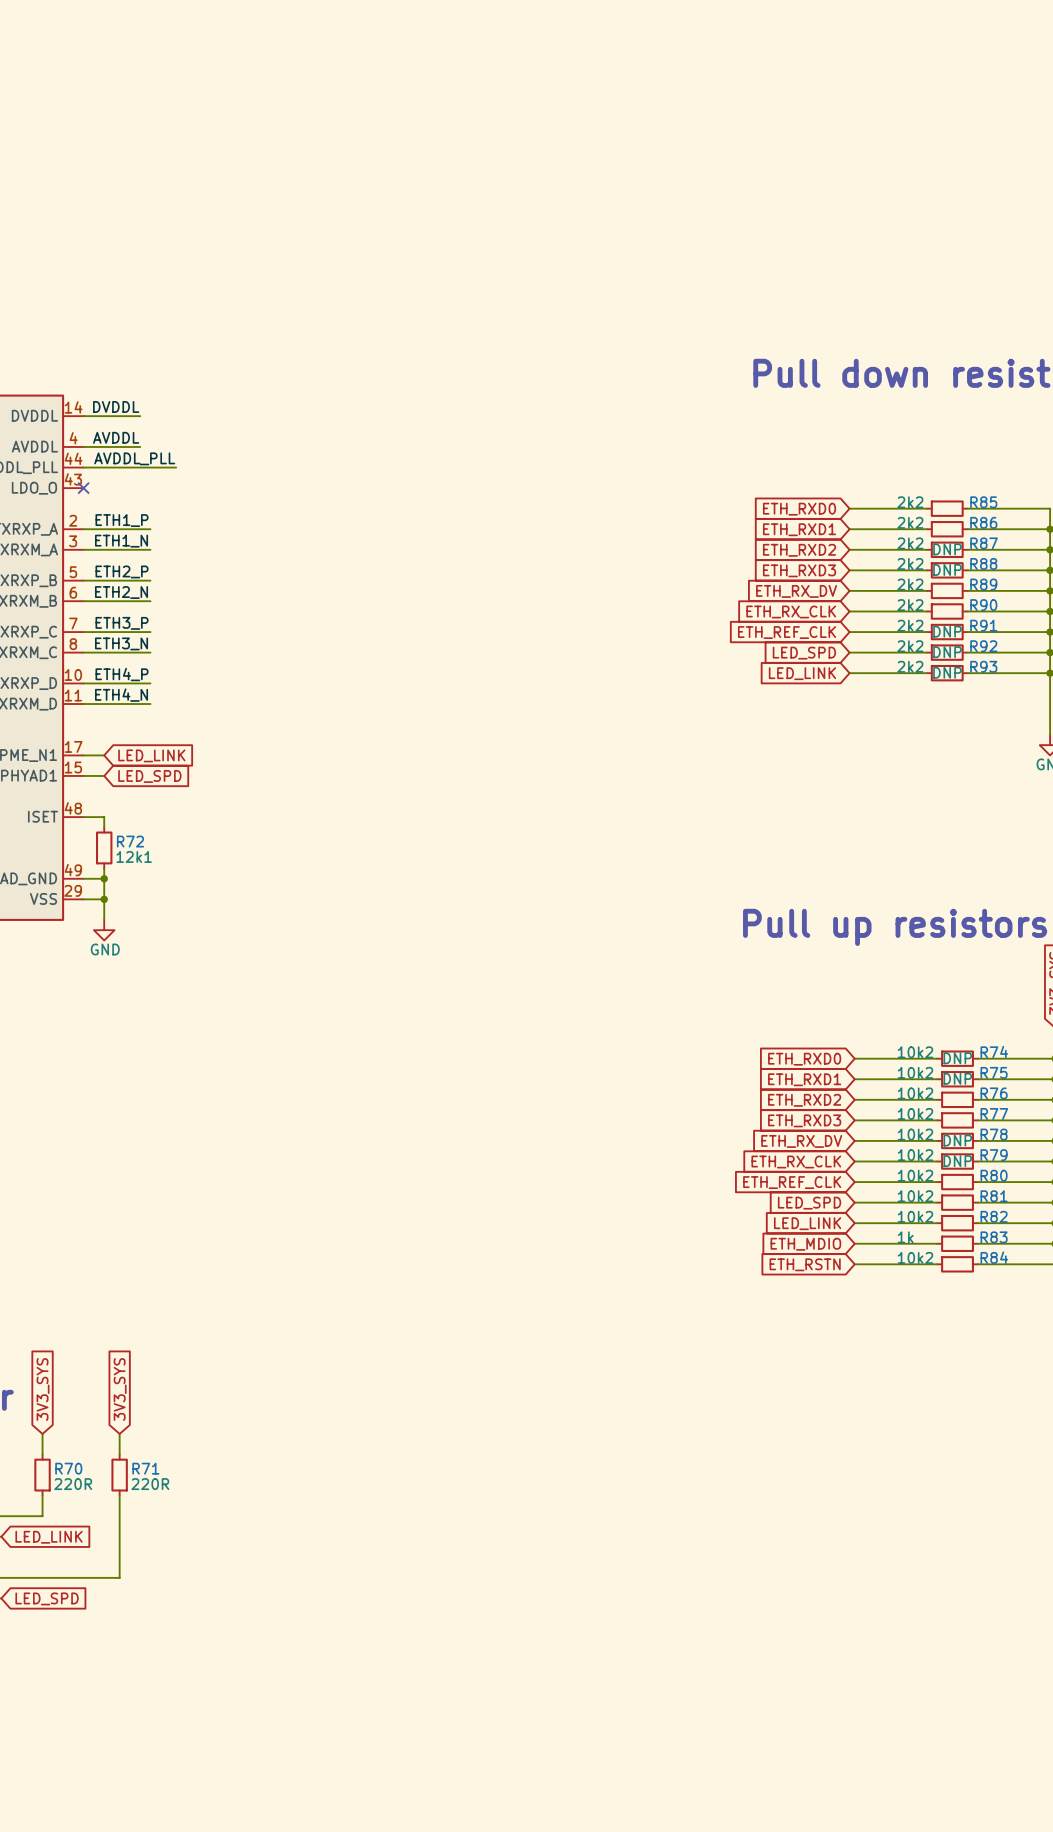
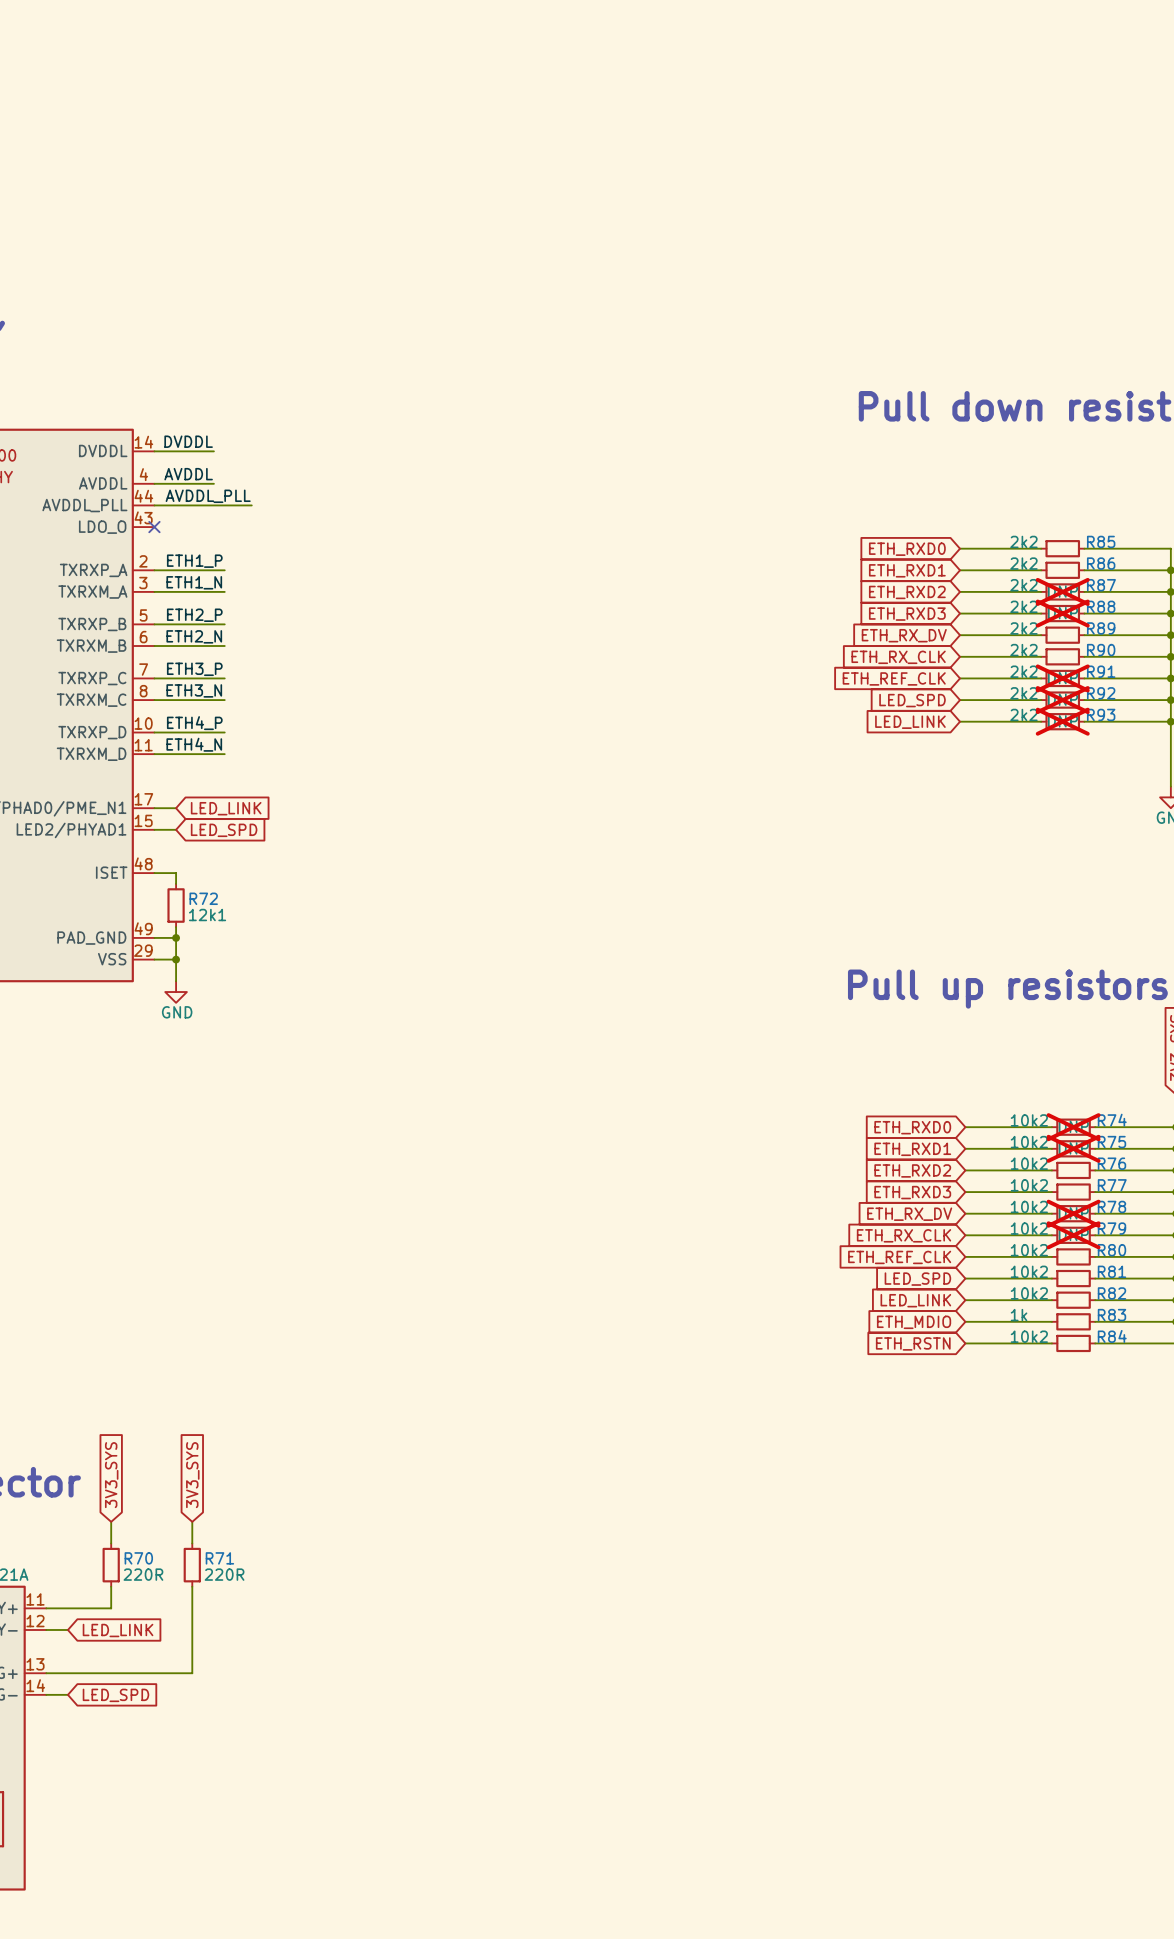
R87 do-not-place cross: none -> (1062, 591)
R88 do-not-place cross: none -> (1062, 613)
R91 do-not-place cross: none -> (1062, 678)
R92 do-not-place cross: none -> (1062, 700)
R93 do-not-place cross: none -> (1062, 721)
R74 do-not-place cross: none -> (1073, 1127)
R75 do-not-place cross: none -> (1073, 1148)
R78 do-not-place cross: none -> (1073, 1213)
R79 do-not-place cross: none -> (1073, 1235)

